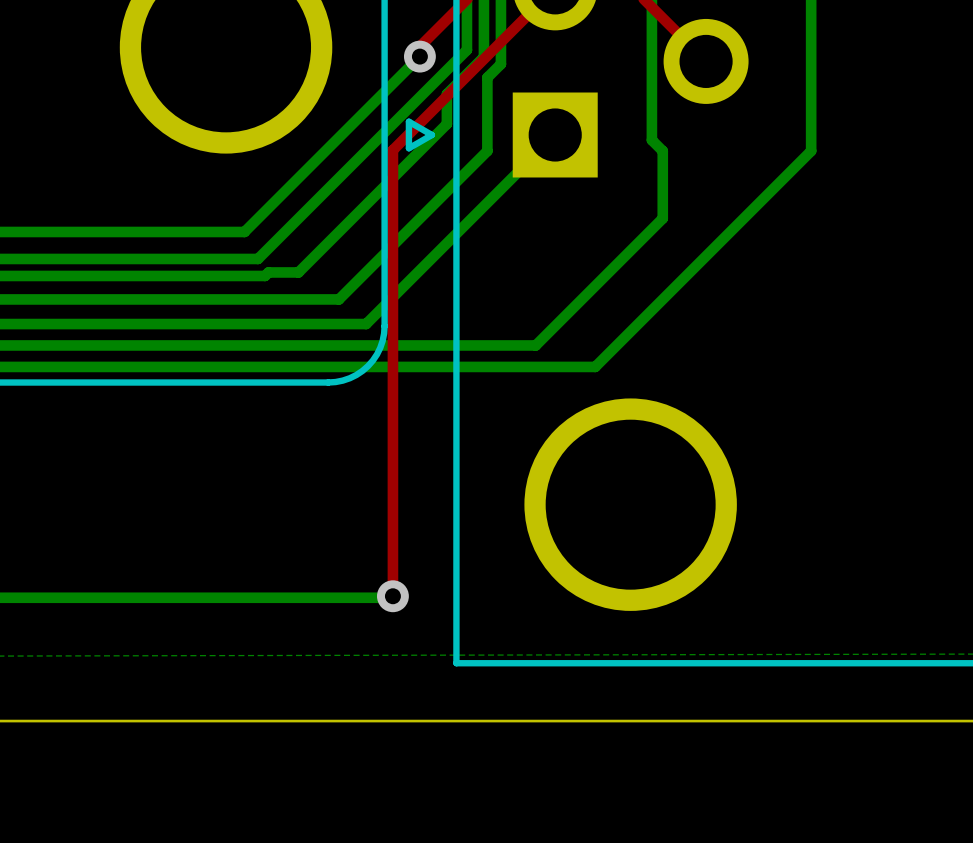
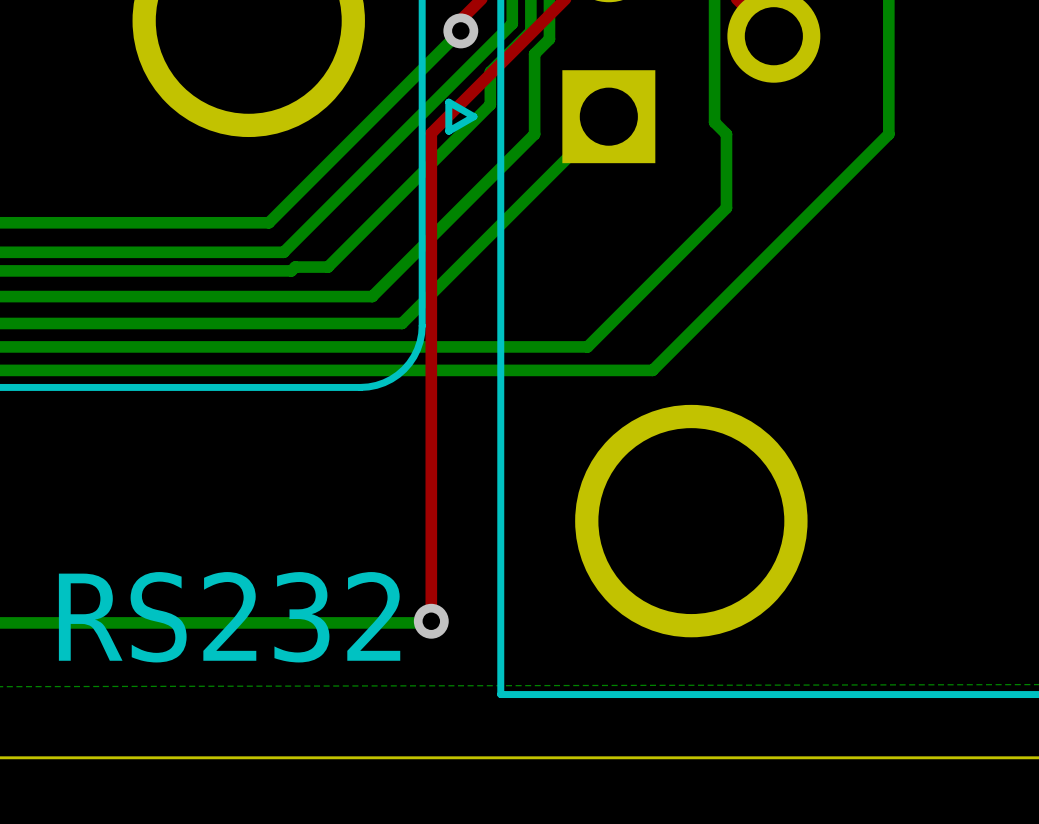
text: none -> RS232 (229, 617)

